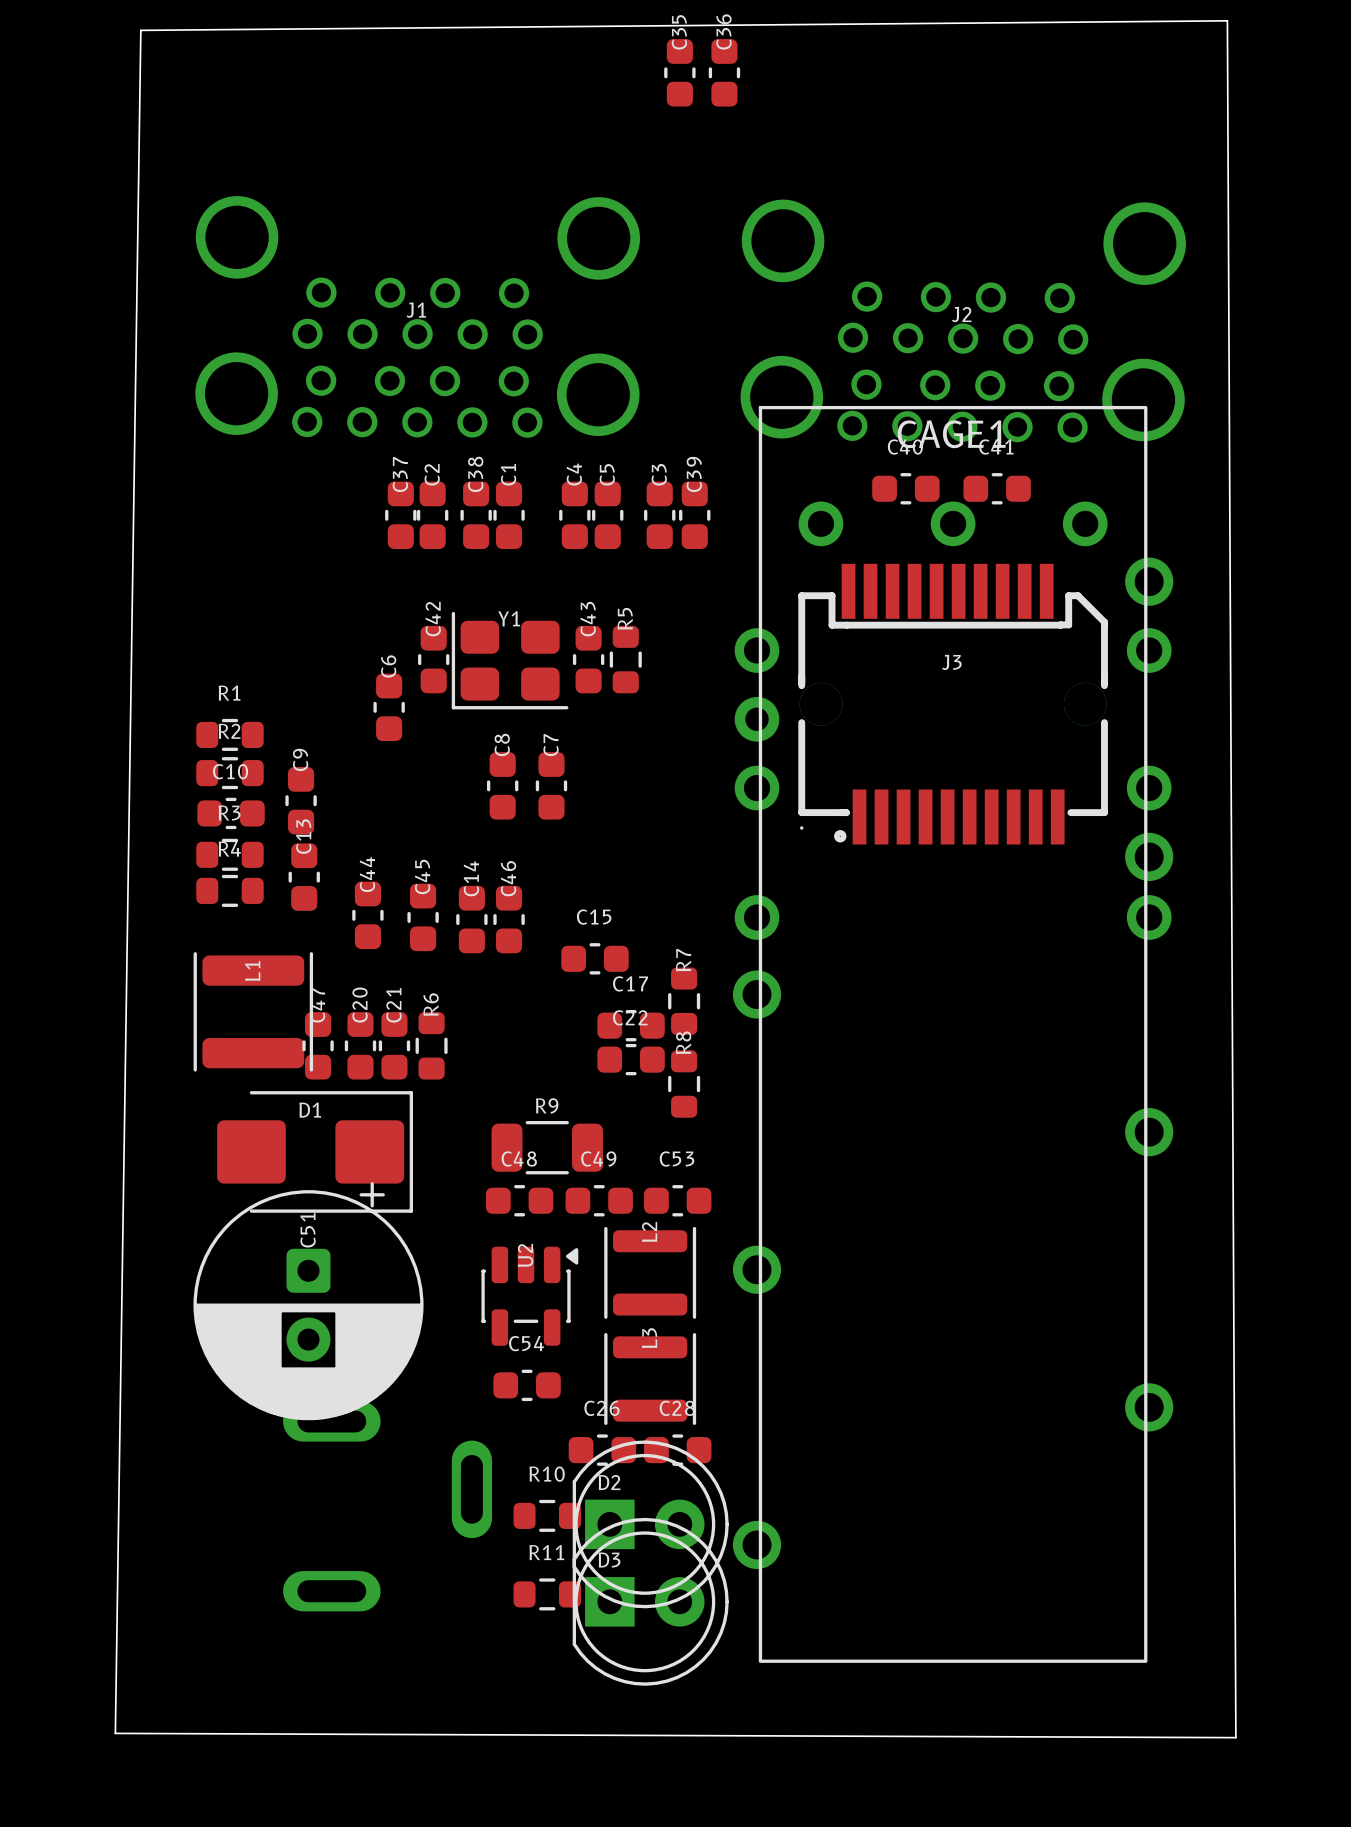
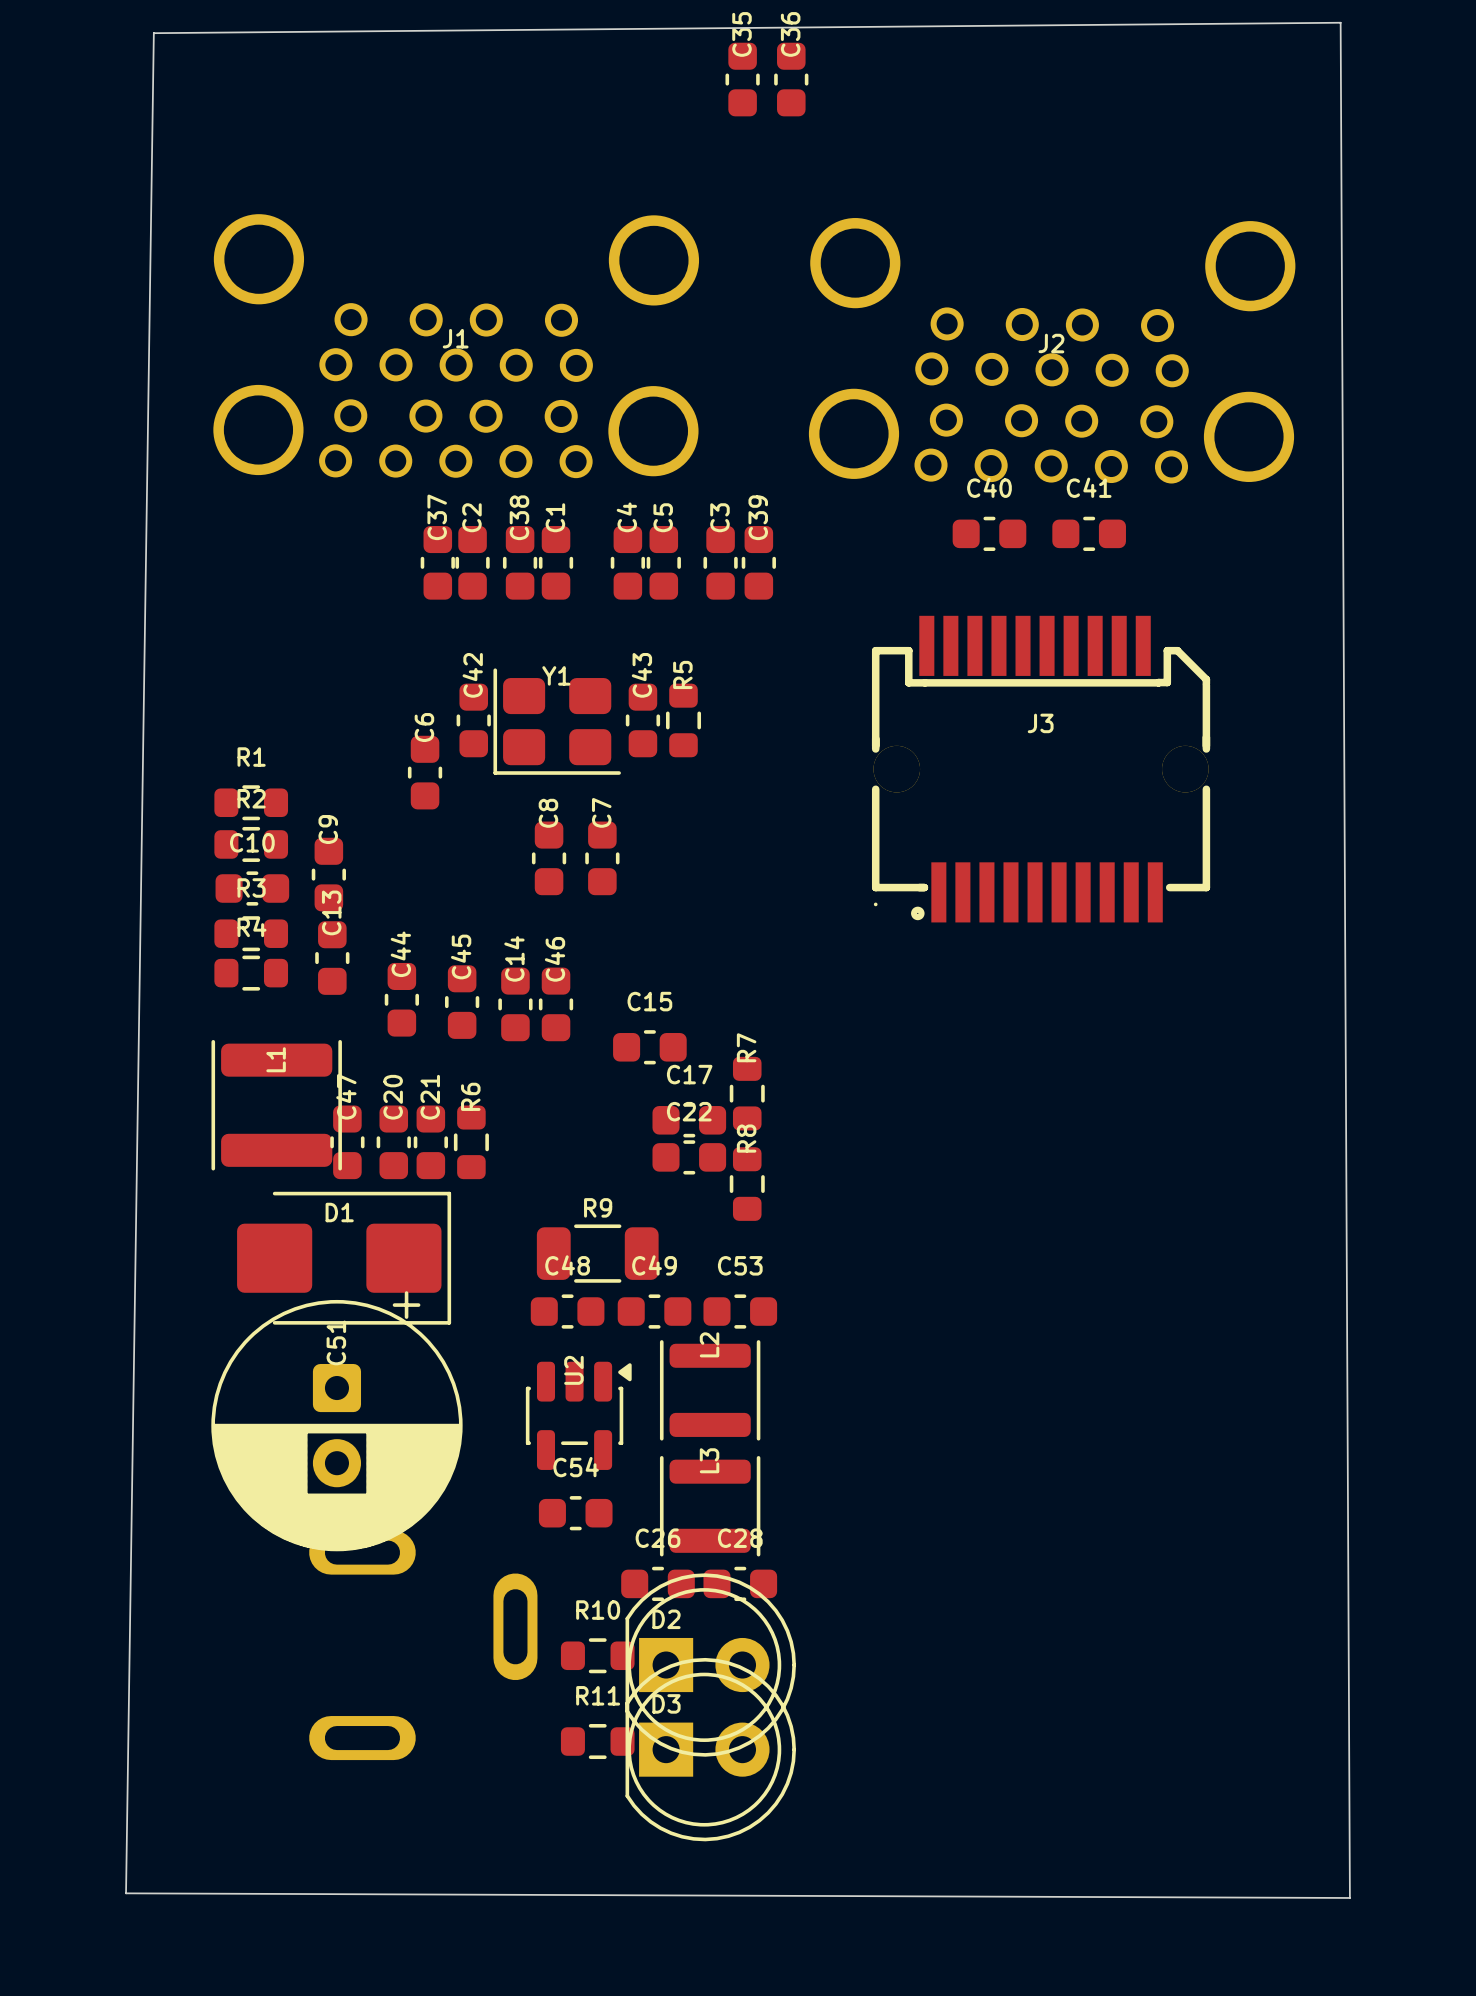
CAGE1: (953, 1034) -> none

